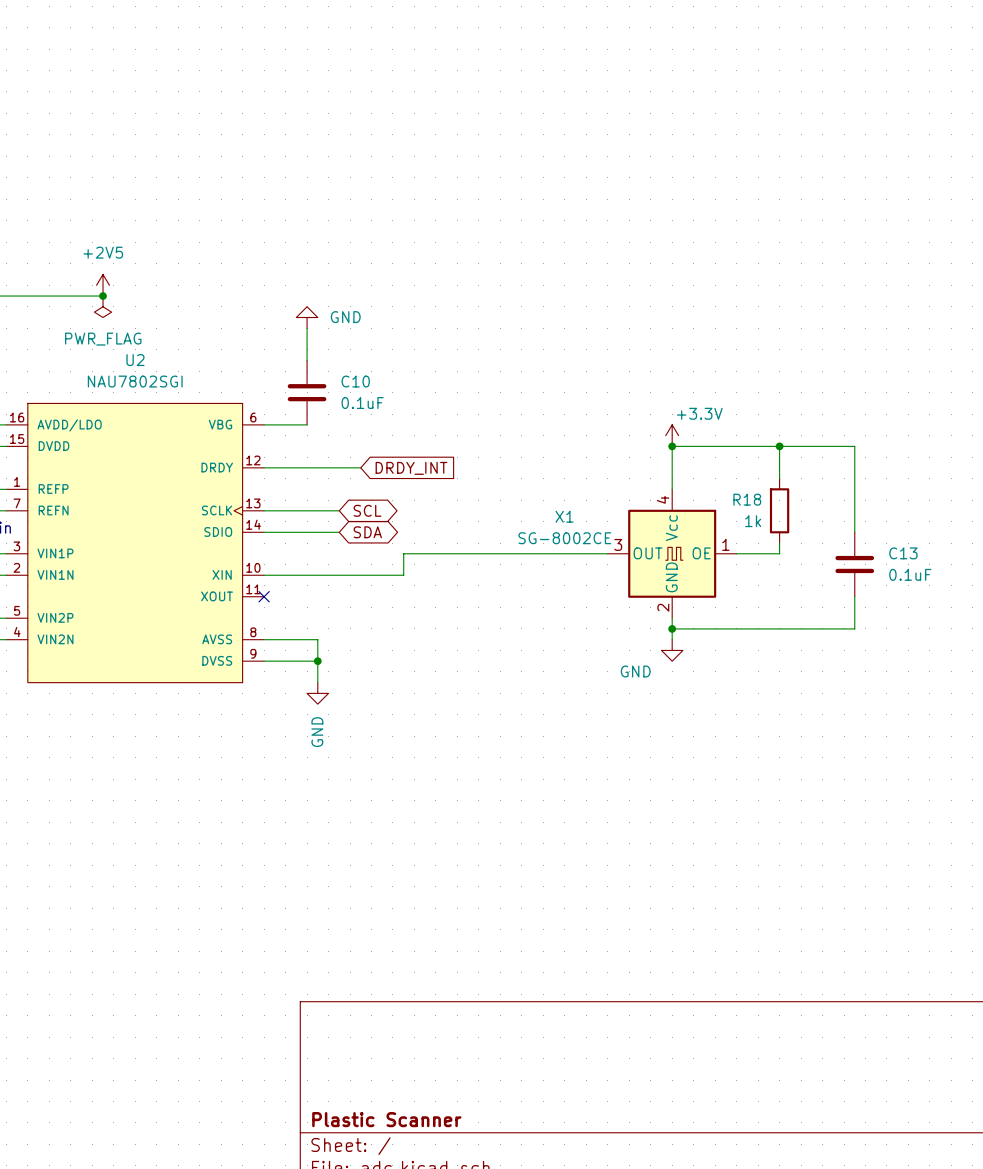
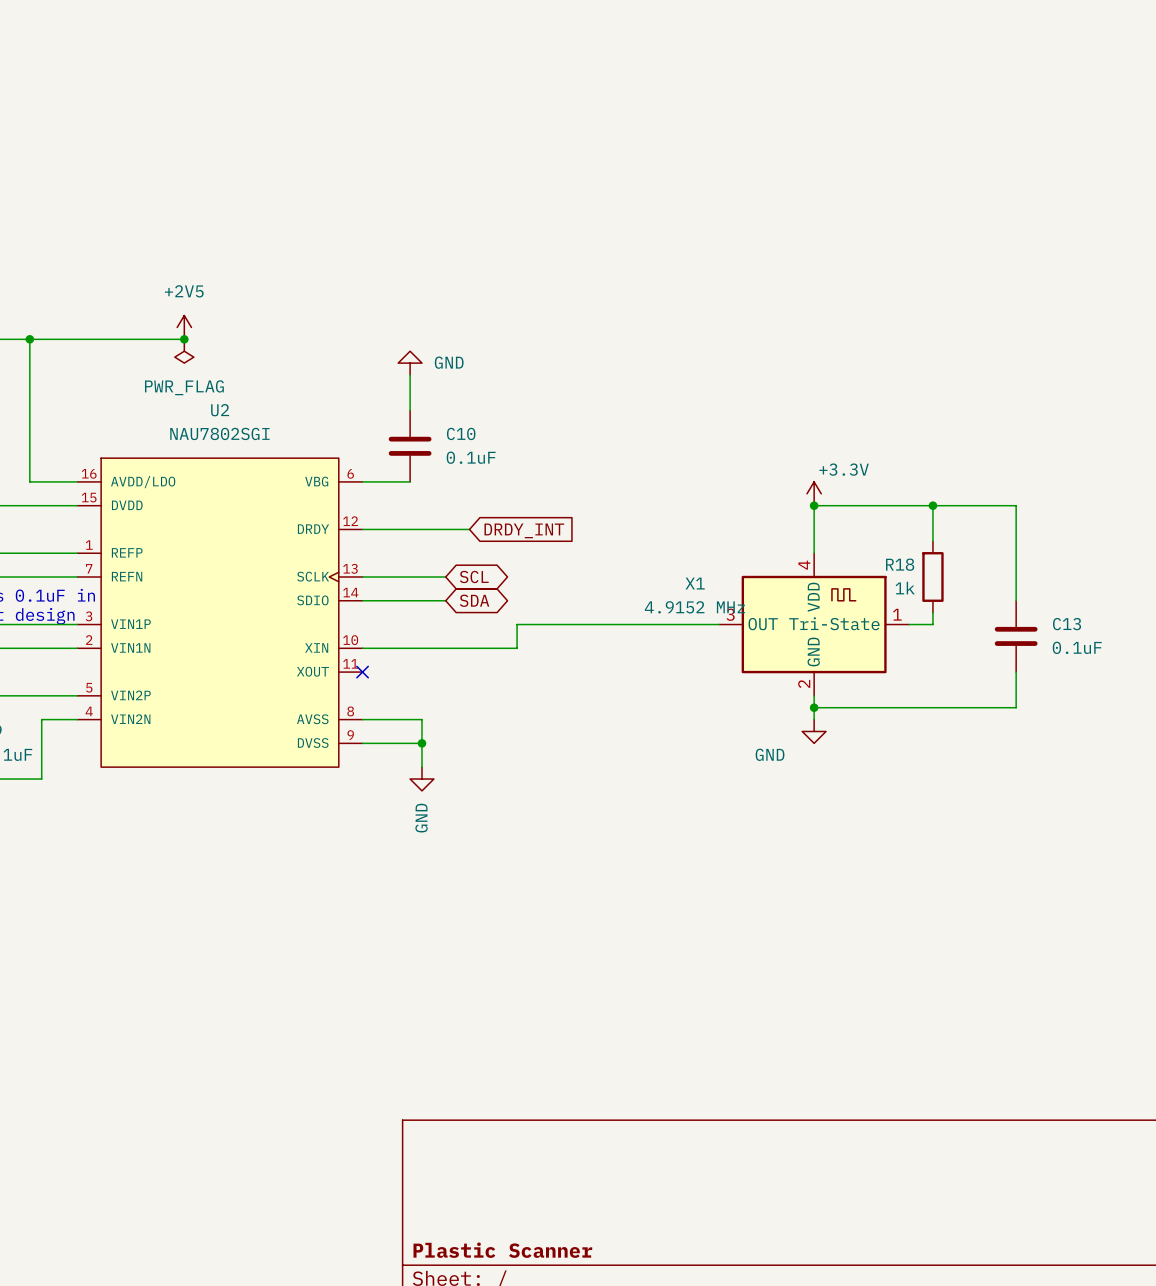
X1 symbol: [607, 489, 737, 619] -> [719, 553, 910, 696]
X1 value: SG-8002CE (564, 538) -> 4.9152 MHz (694, 607)

